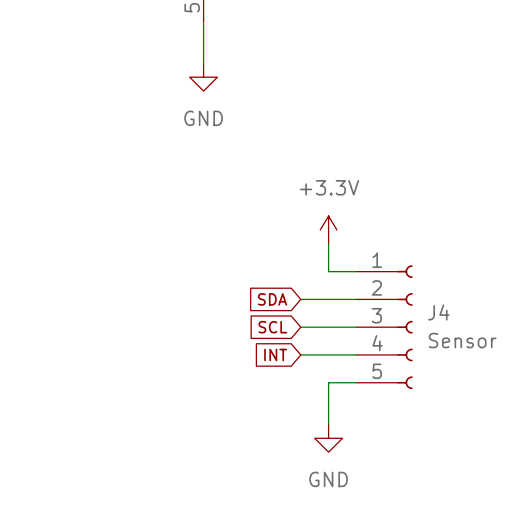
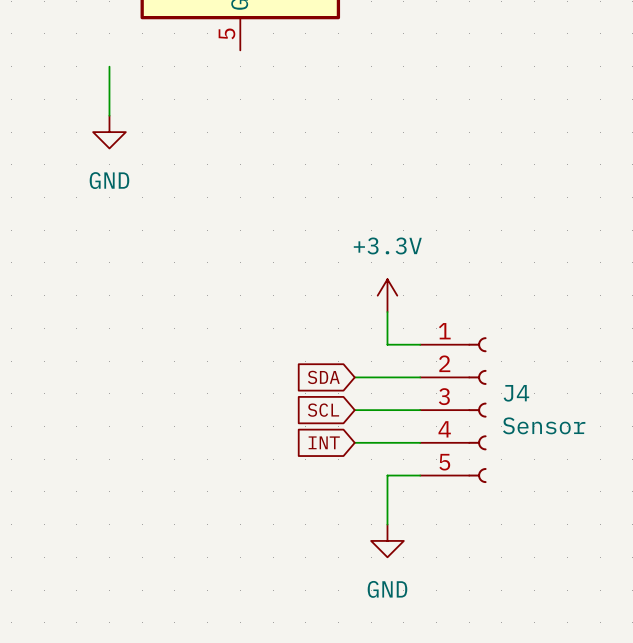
wire: (203, 21) (203, 63) -> (109, 66) (109, 115)
power symbol position: GND (203, 77) -> GND (109, 132)

